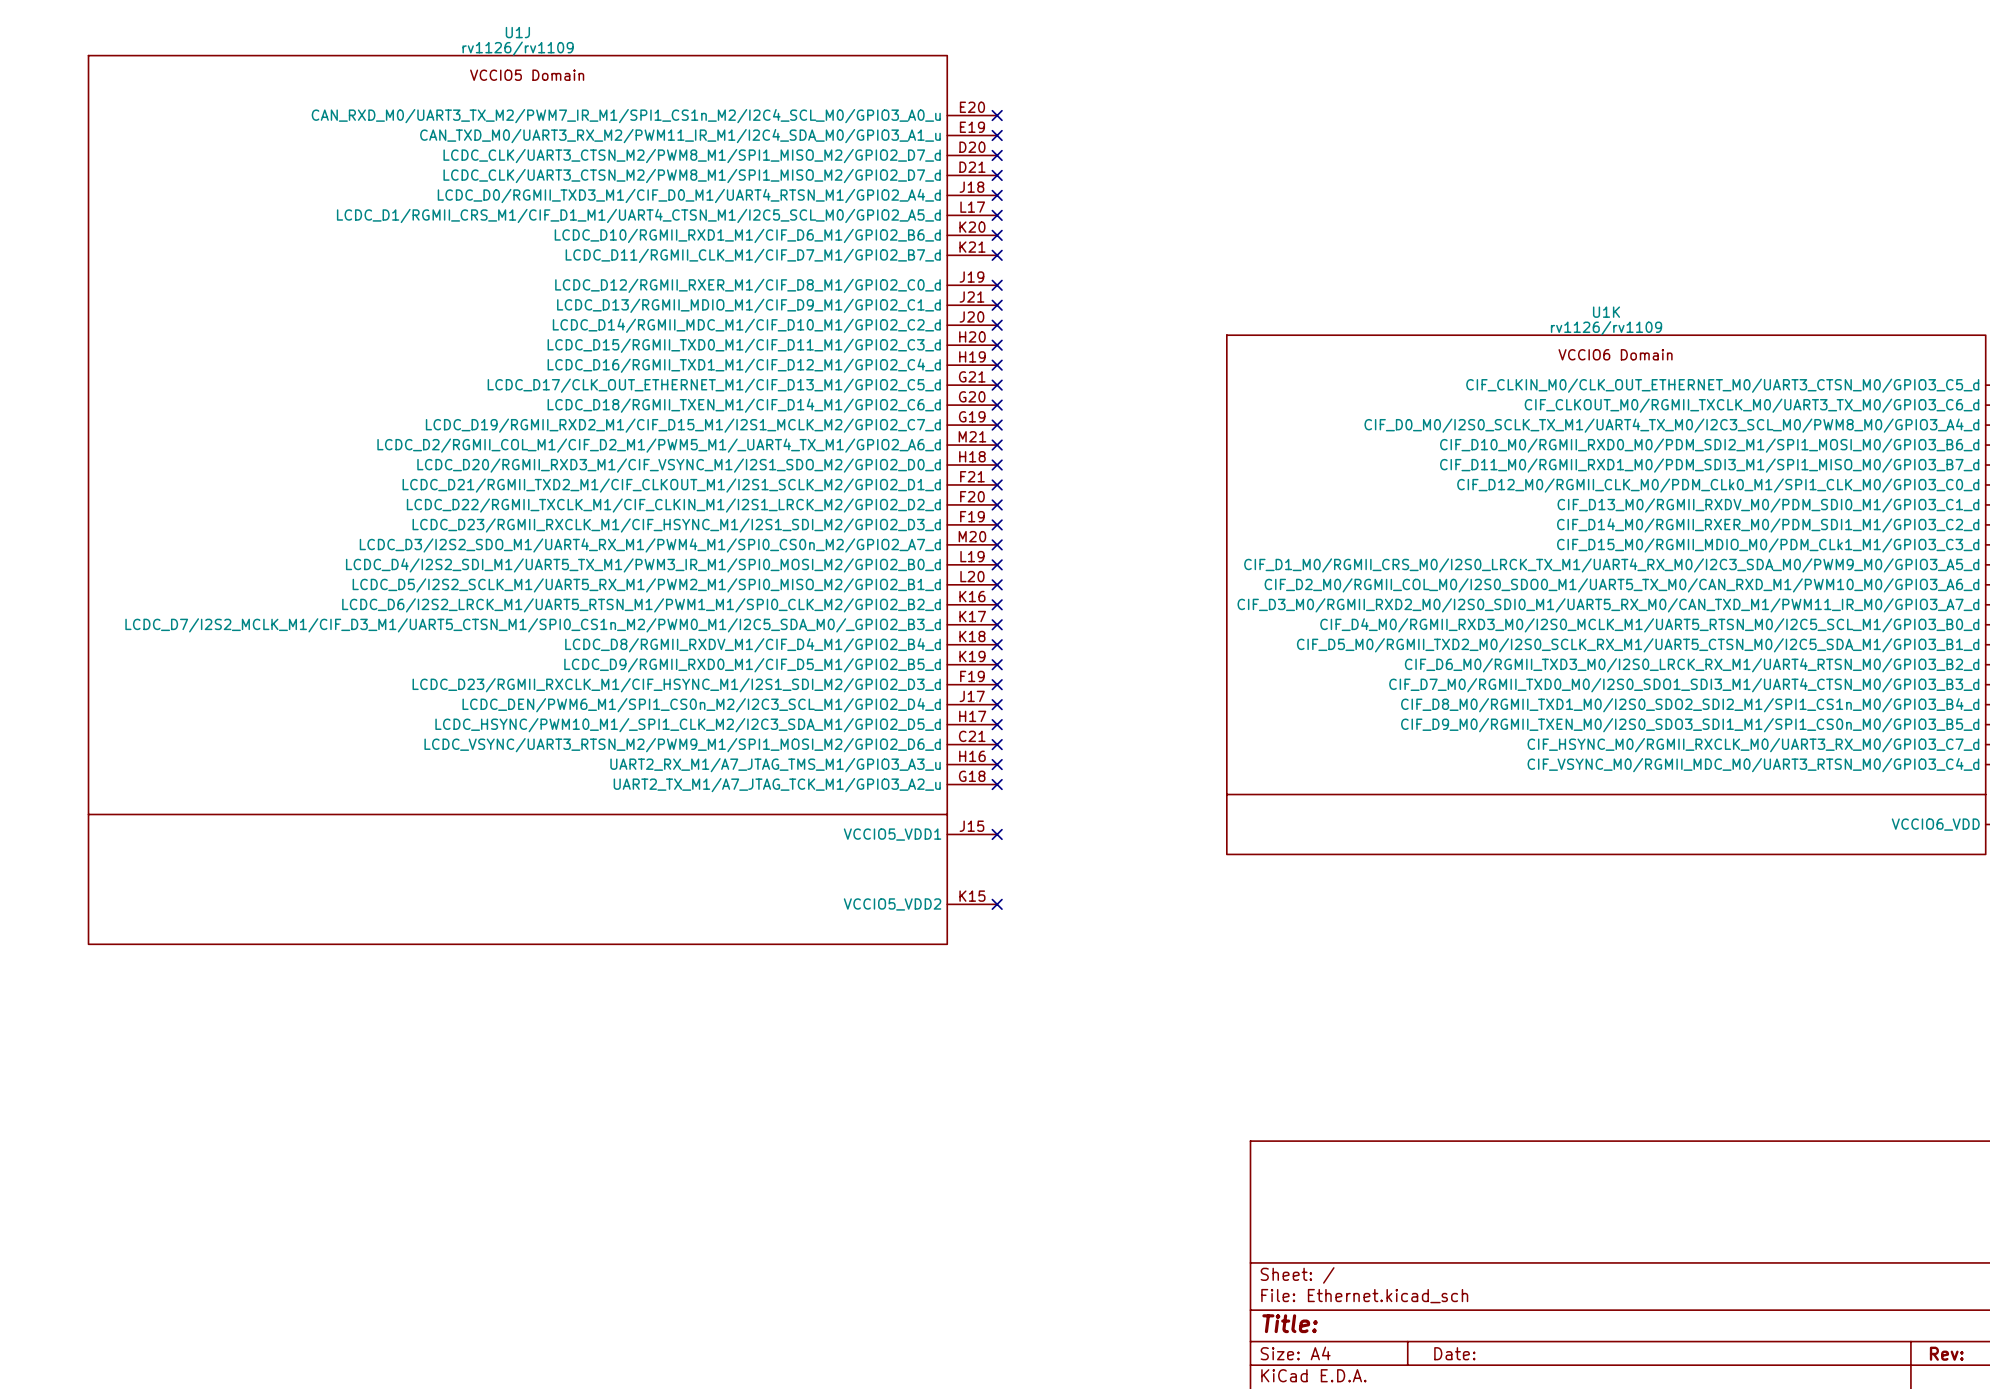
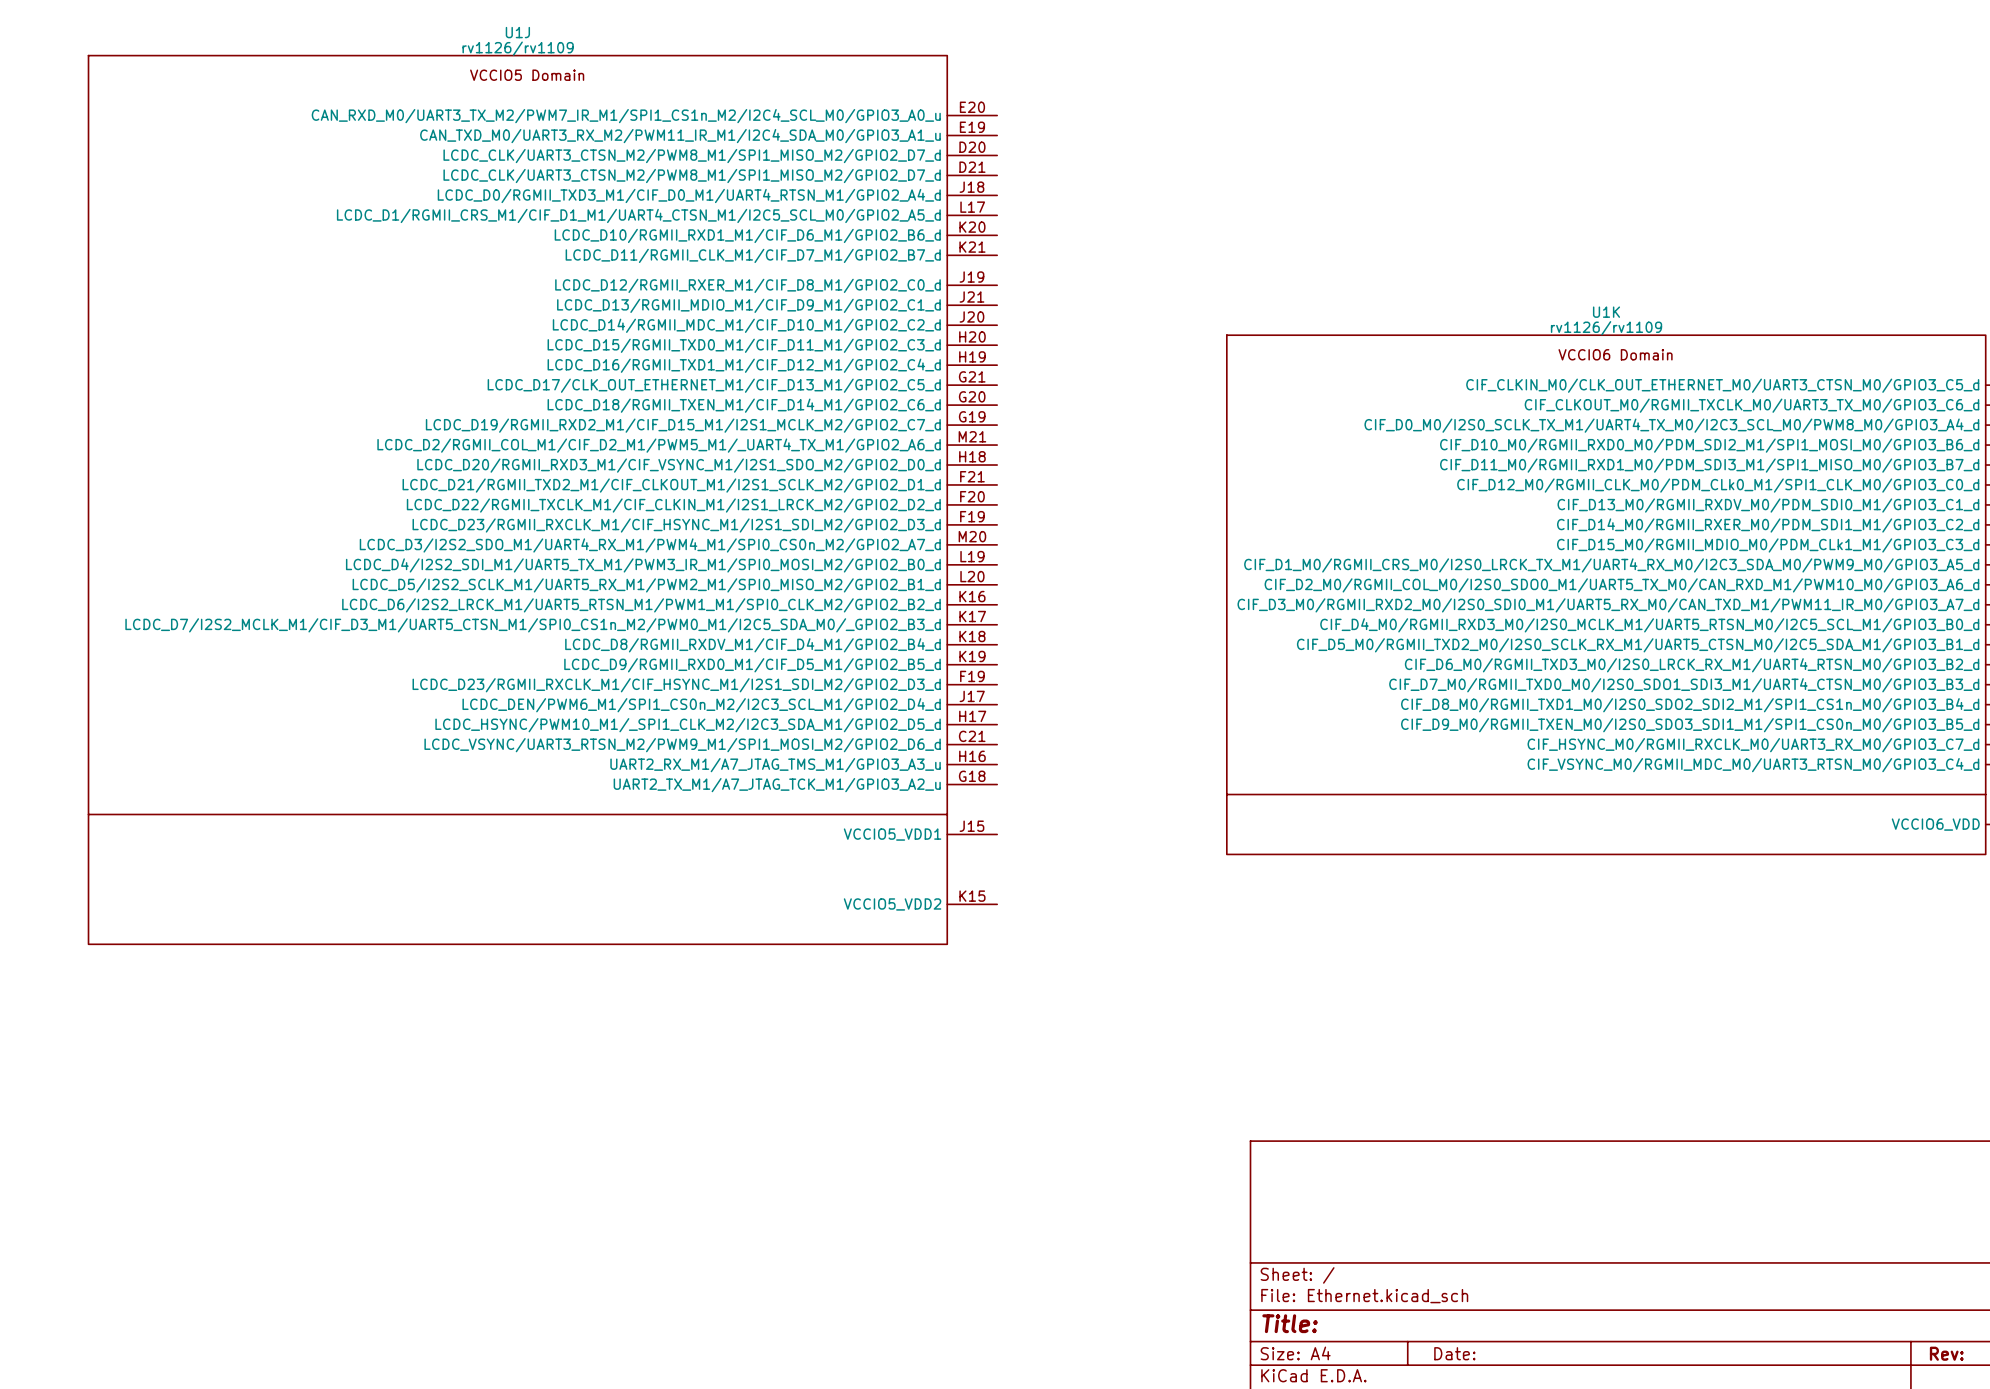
no-connect mark: (997, 115) -> none
no-connect mark: (997, 135) -> none
no-connect mark: (997, 155) -> none
no-connect mark: (997, 175) -> none
no-connect mark: (997, 195) -> none
no-connect mark: (997, 215) -> none
no-connect mark: (997, 235) -> none
no-connect mark: (997, 255) -> none
no-connect mark: (997, 285) -> none
no-connect mark: (997, 305) -> none
no-connect mark: (997, 325) -> none
no-connect mark: (997, 345) -> none
no-connect mark: (997, 365) -> none
no-connect mark: (997, 385) -> none
no-connect mark: (997, 405) -> none
no-connect mark: (997, 425) -> none
no-connect mark: (997, 445) -> none
no-connect mark: (997, 465) -> none
no-connect mark: (997, 484) -> none
no-connect mark: (997, 504) -> none
no-connect mark: (997, 524) -> none
no-connect mark: (997, 544) -> none
no-connect mark: (997, 564) -> none
no-connect mark: (997, 584) -> none
no-connect mark: (997, 604) -> none
no-connect mark: (997, 624) -> none
no-connect mark: (997, 644) -> none
no-connect mark: (997, 664) -> none
no-connect mark: (997, 684) -> none
no-connect mark: (997, 704) -> none
no-connect mark: (997, 724) -> none
no-connect mark: (997, 744) -> none
no-connect mark: (997, 764) -> none
no-connect mark: (997, 784) -> none
no-connect mark: (997, 834) -> none
no-connect mark: (997, 904) -> none

